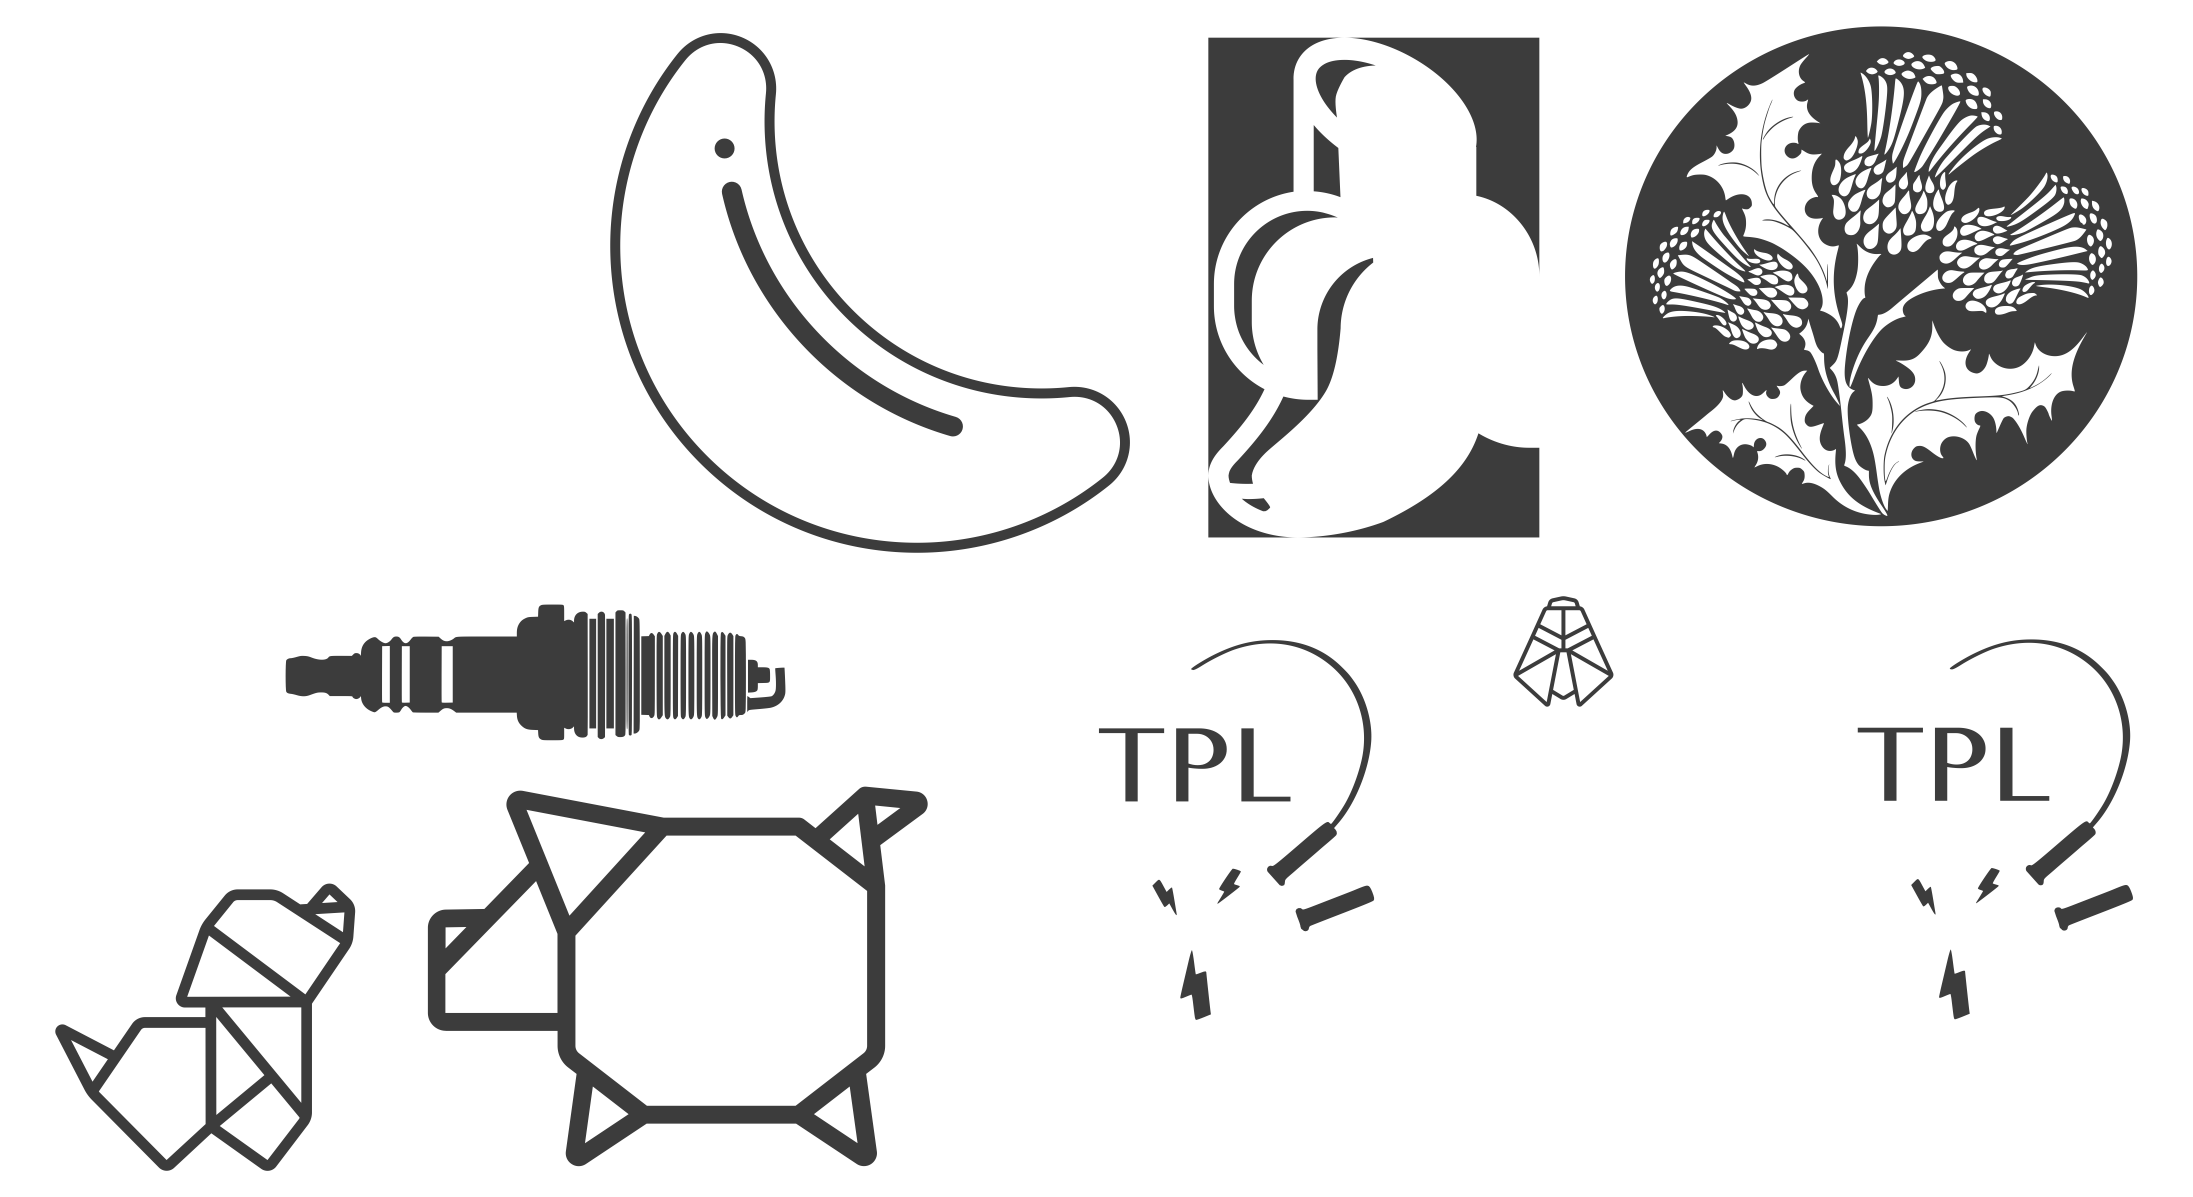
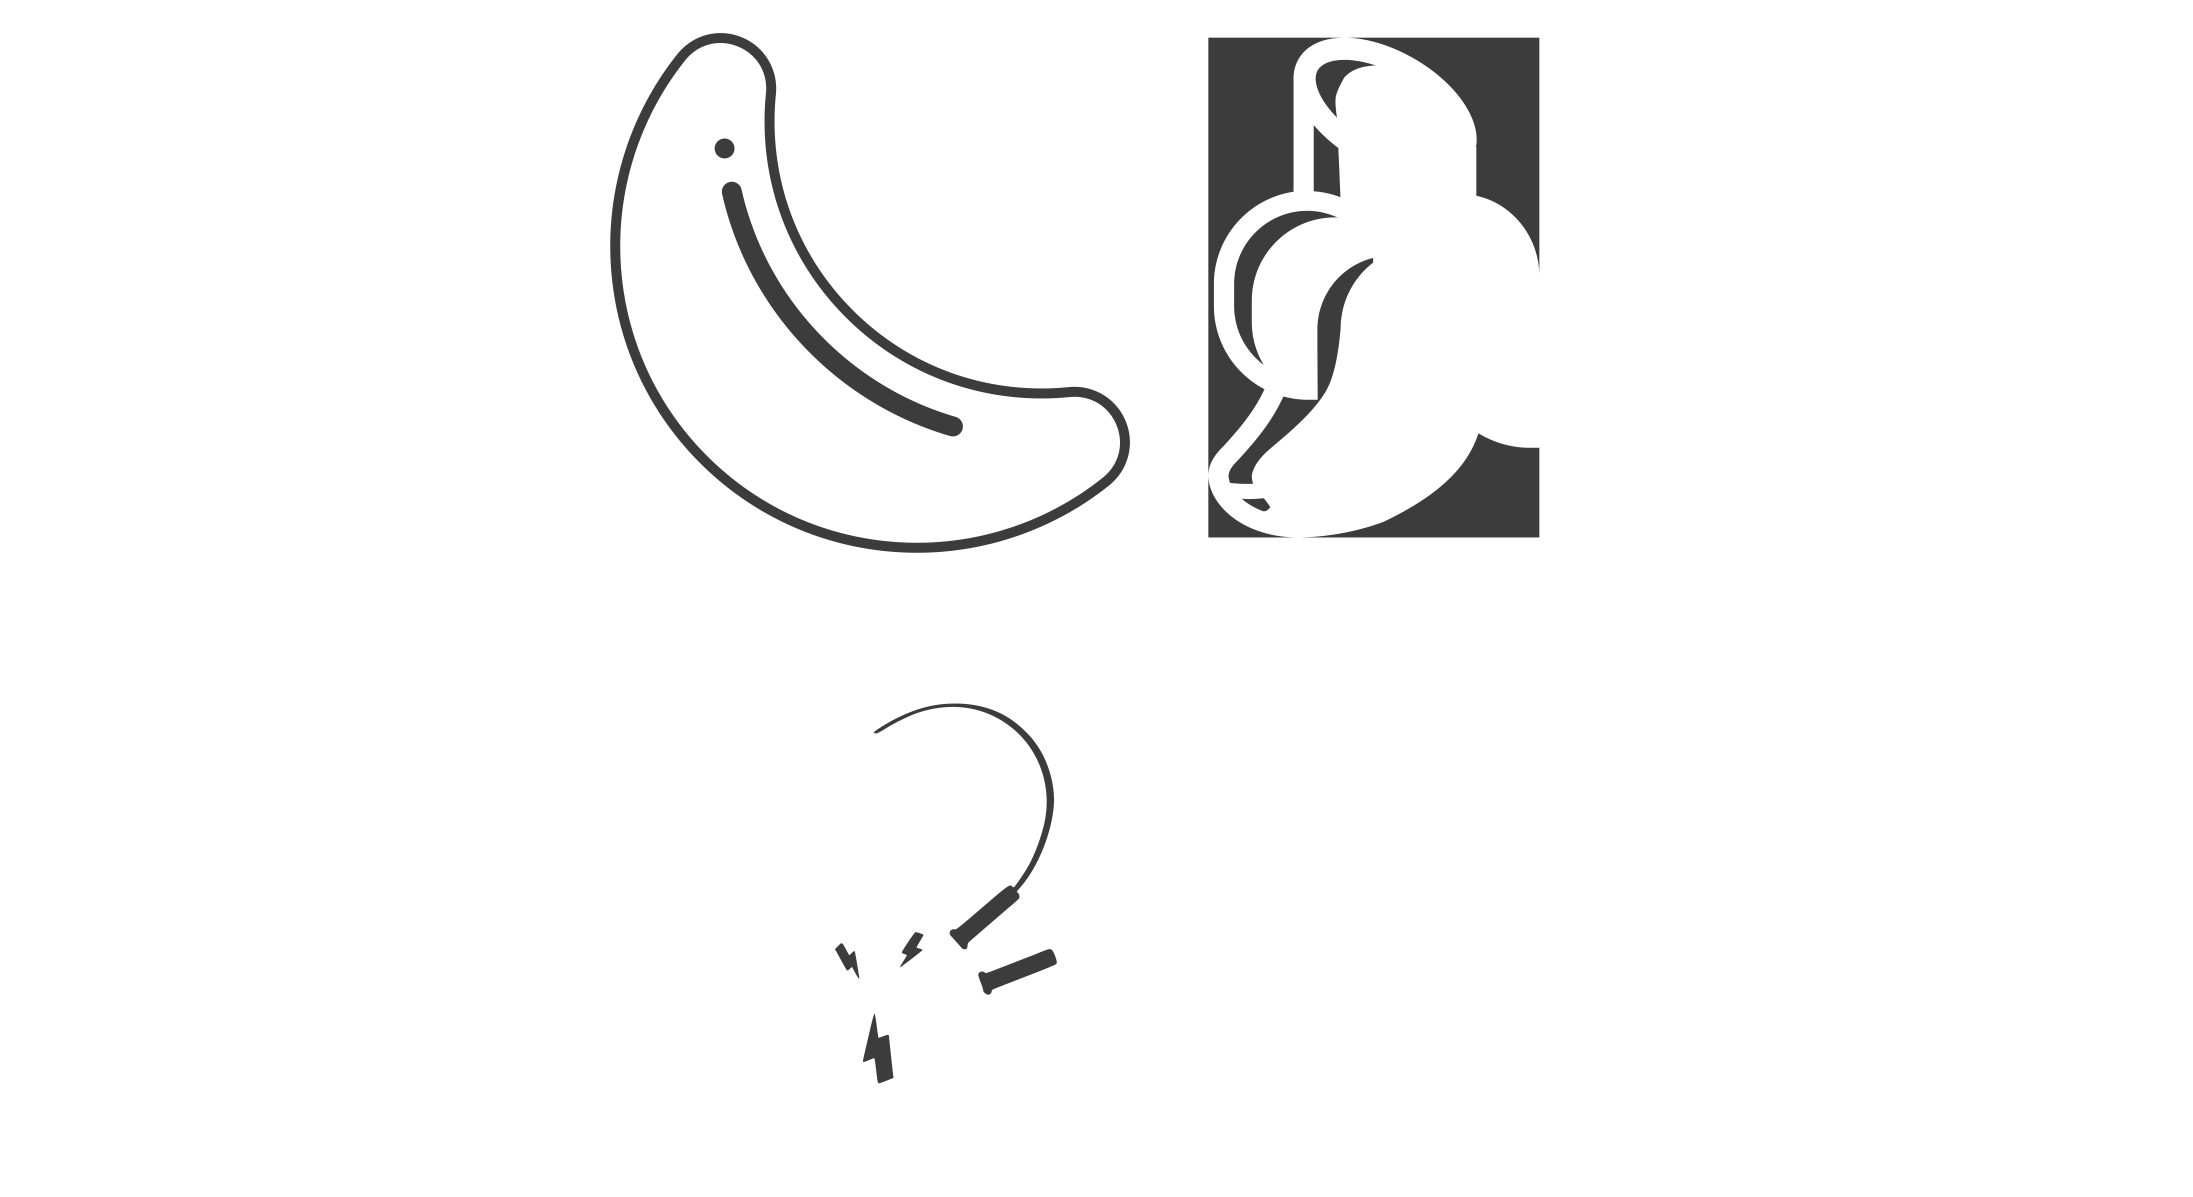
drawing: [1625, 26, 2138, 527] -> none
drawing: [1513, 596, 1614, 707] -> none
drawing: [285, 604, 786, 741] -> none
drawing: [1857, 639, 2133, 1020] -> none
drawing: [1098, 640, 1375, 1020] -> none
drawing: none -> [835, 703, 1057, 1084]
drawing: [427, 786, 928, 1167] -> none
drawing: [55, 883, 356, 1171] -> none

